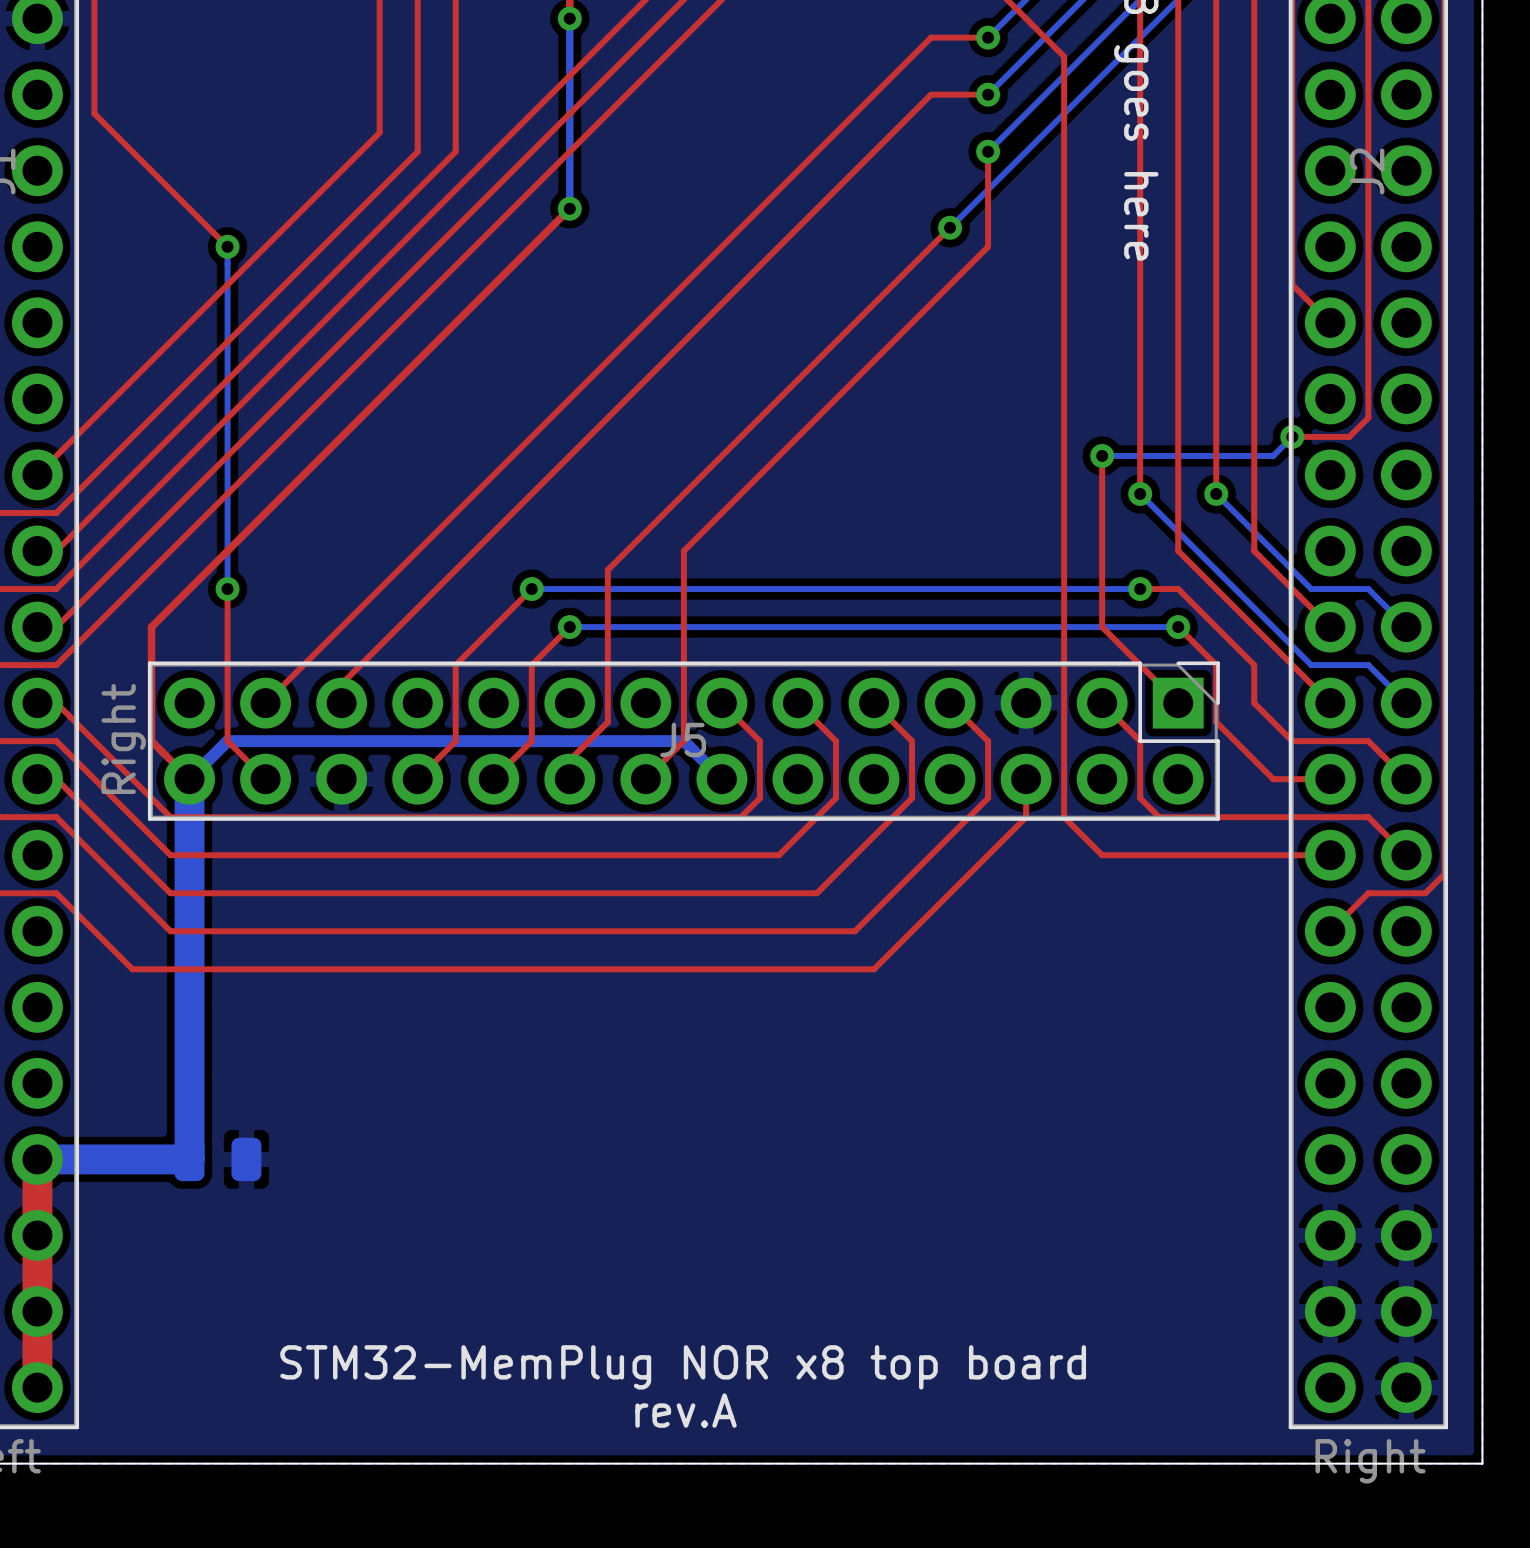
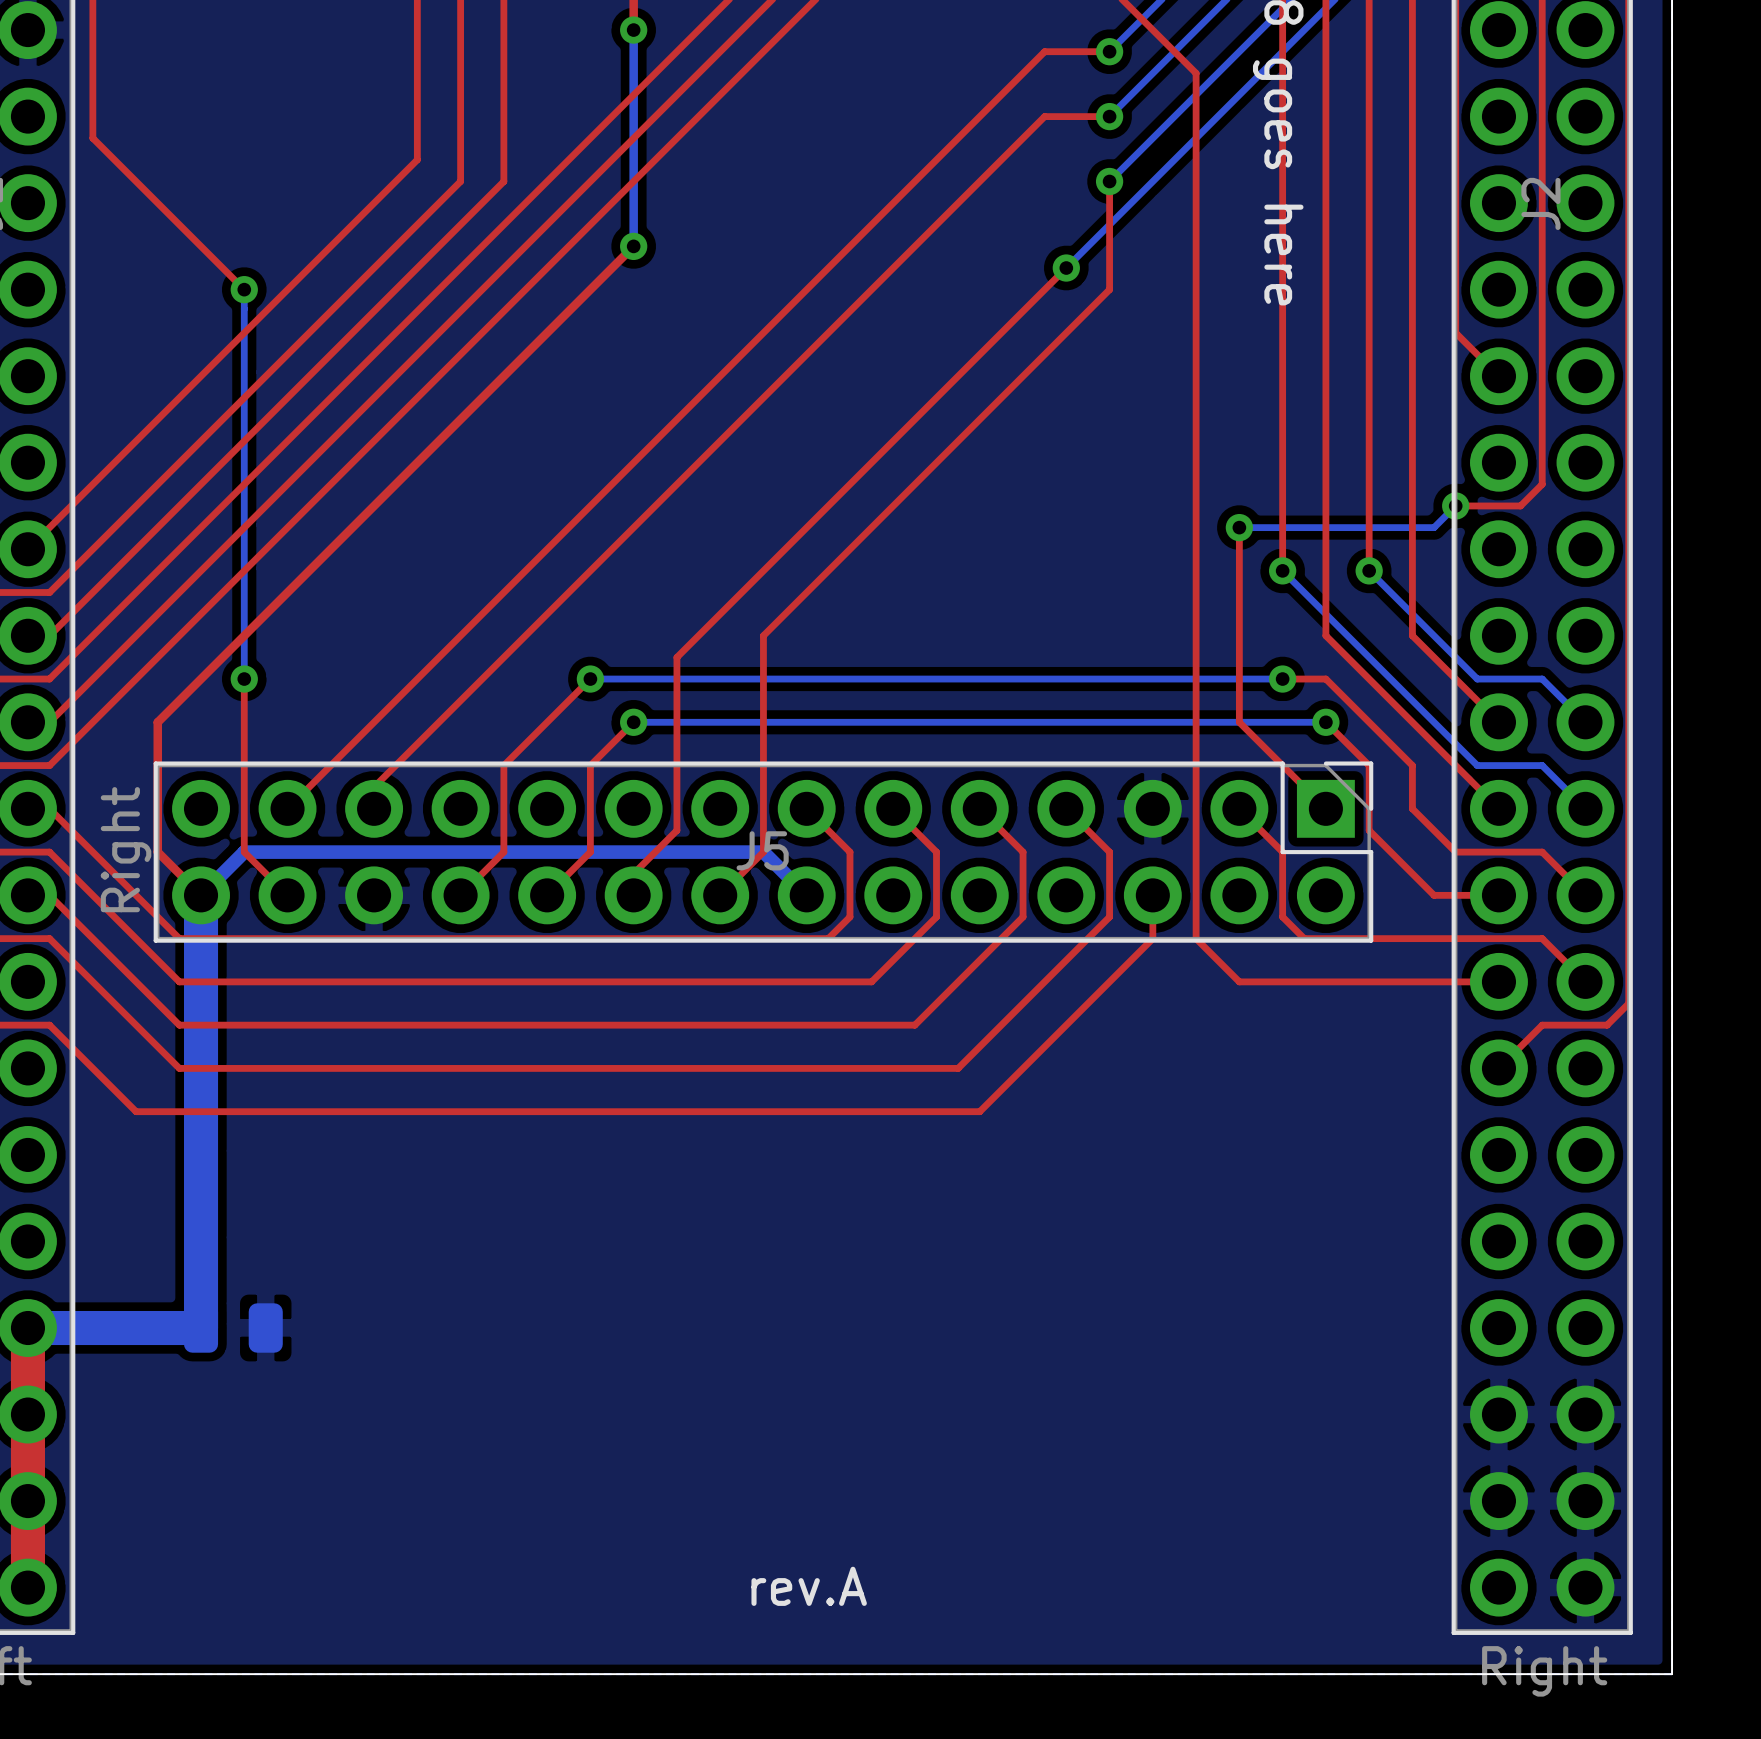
text: STM32-MemPlug NOR x8 top board (683, 1367) -> none
text position: rev.A (686, 1410) -> rev.A (809, 1586)

